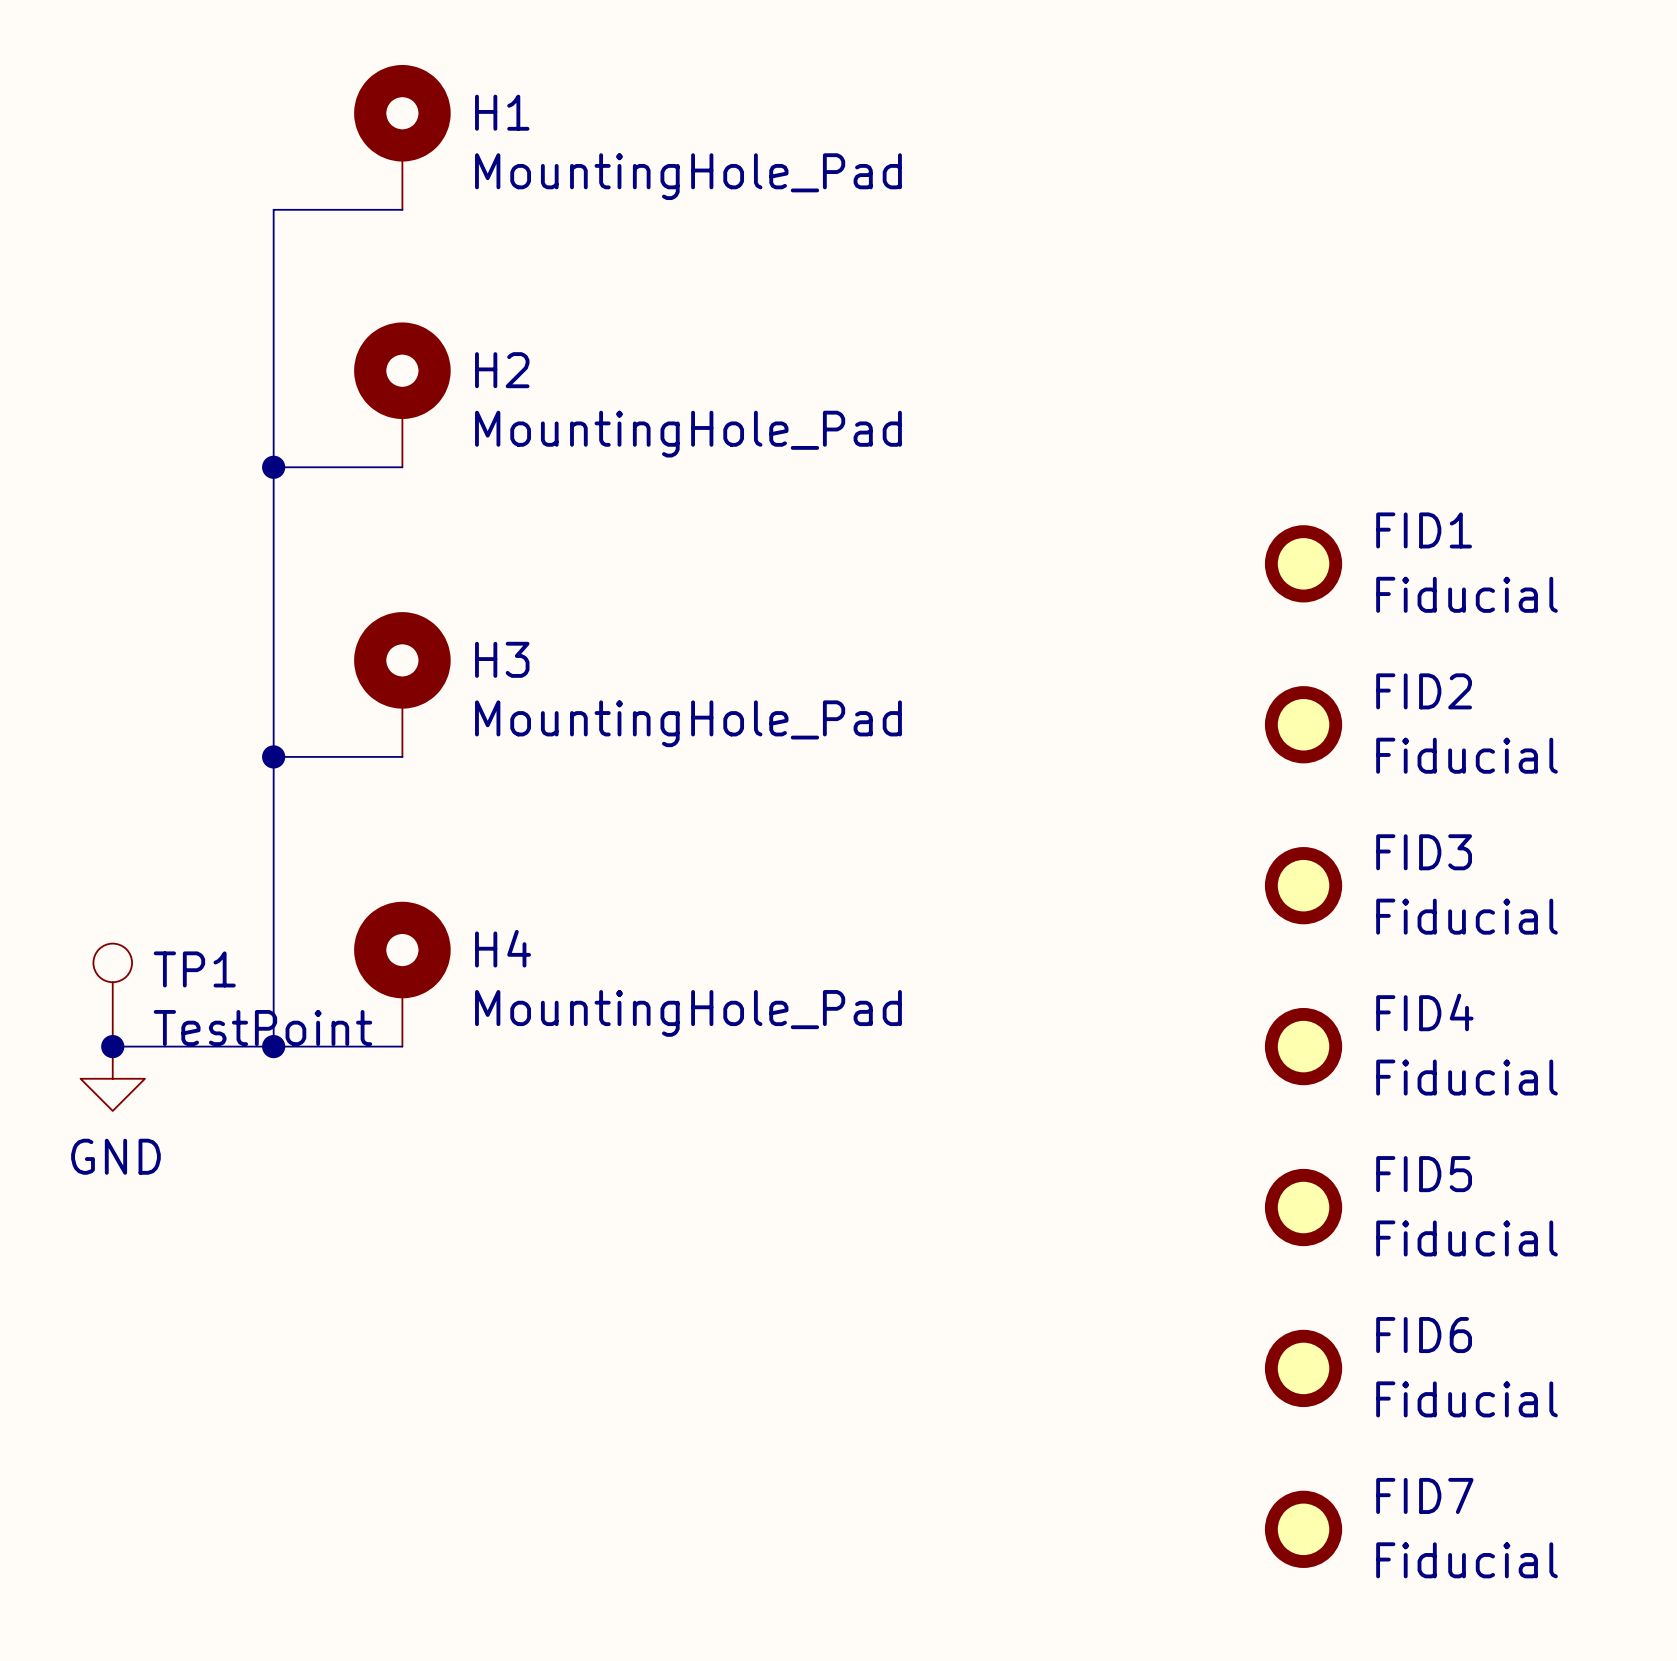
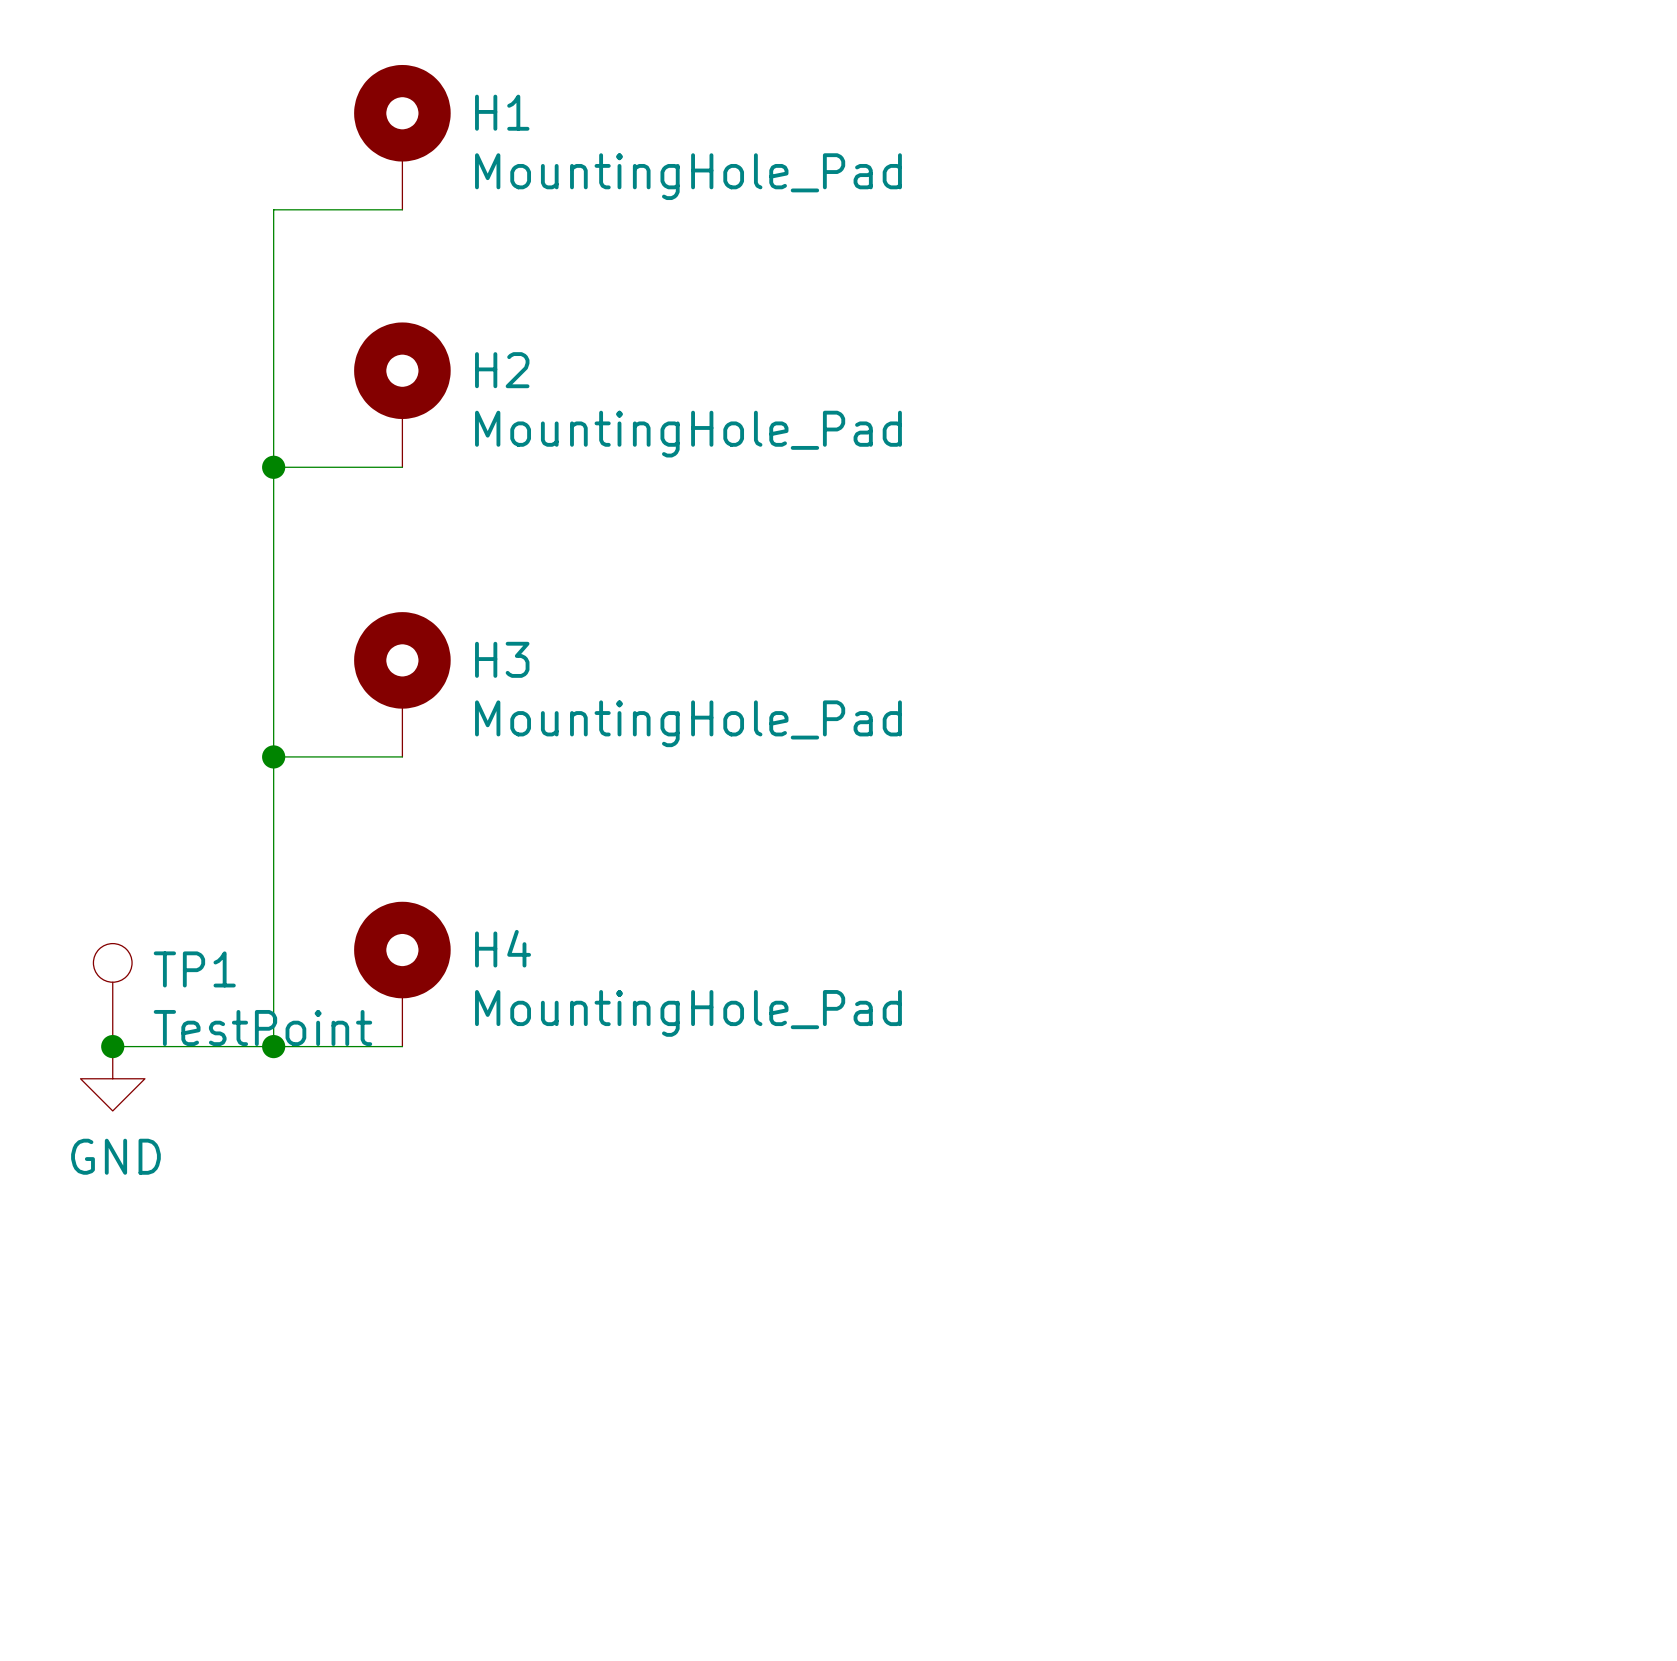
FID1: Fiducial (1303, 563) -> none
FID2: Fiducial (1303, 724) -> none
FID3: Fiducial (1303, 885) -> none
FID4: Fiducial (1303, 1046) -> none
FID5: Fiducial (1303, 1207) -> none
FID6: Fiducial (1303, 1368) -> none
FID7: Fiducial (1303, 1529) -> none

